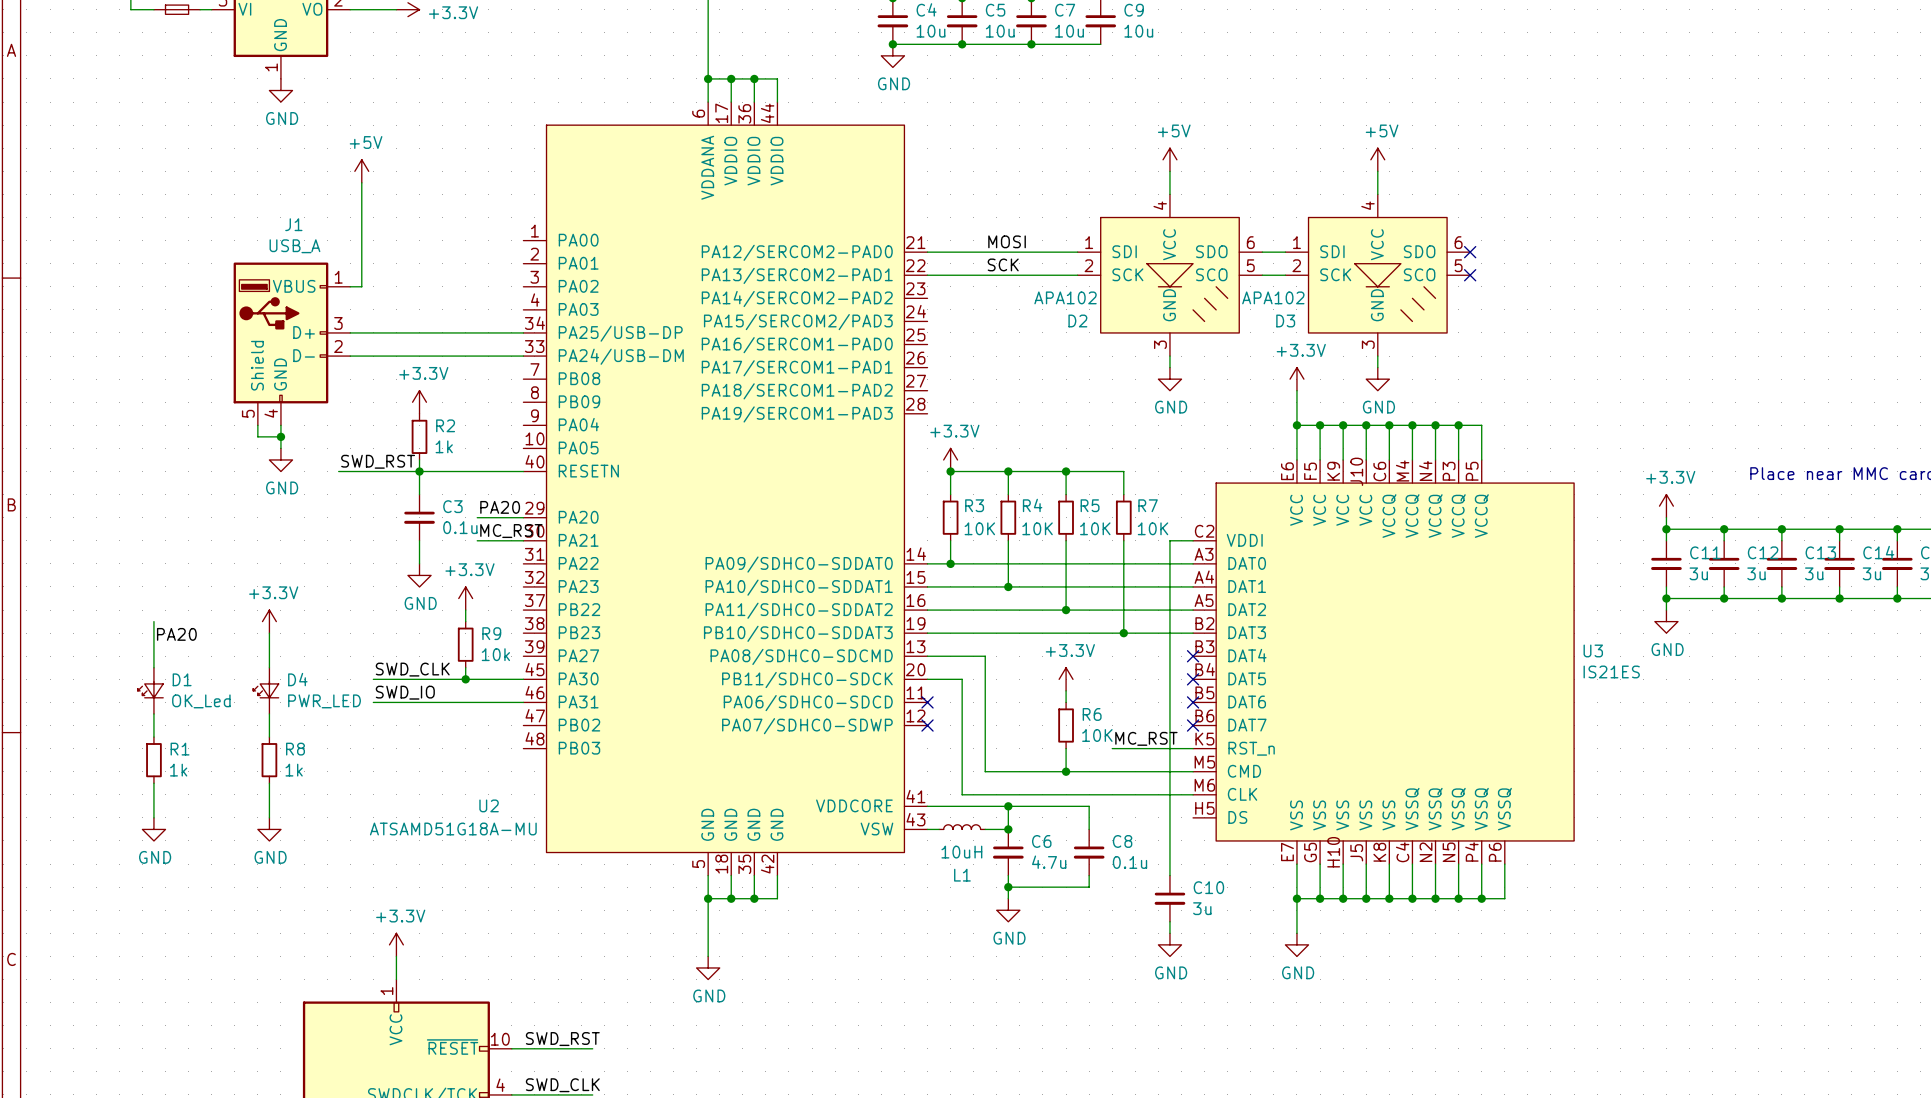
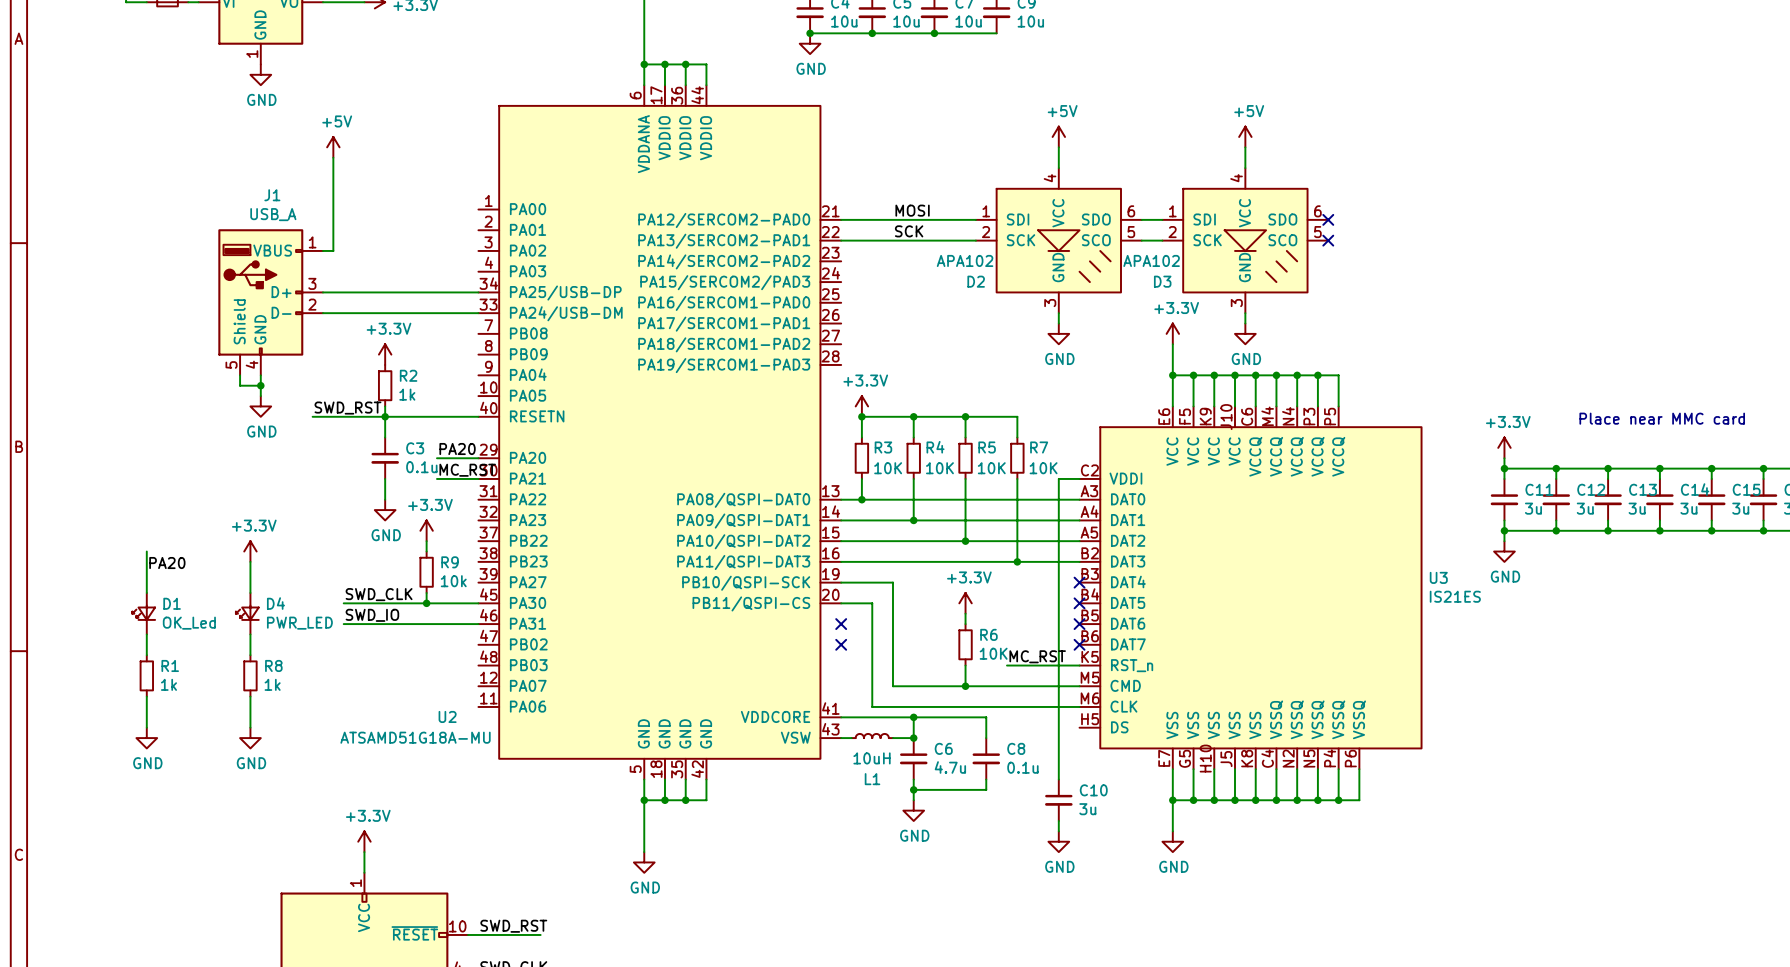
U2 symbol: [523, 102, 928, 876] -> [478, 85, 842, 780]

